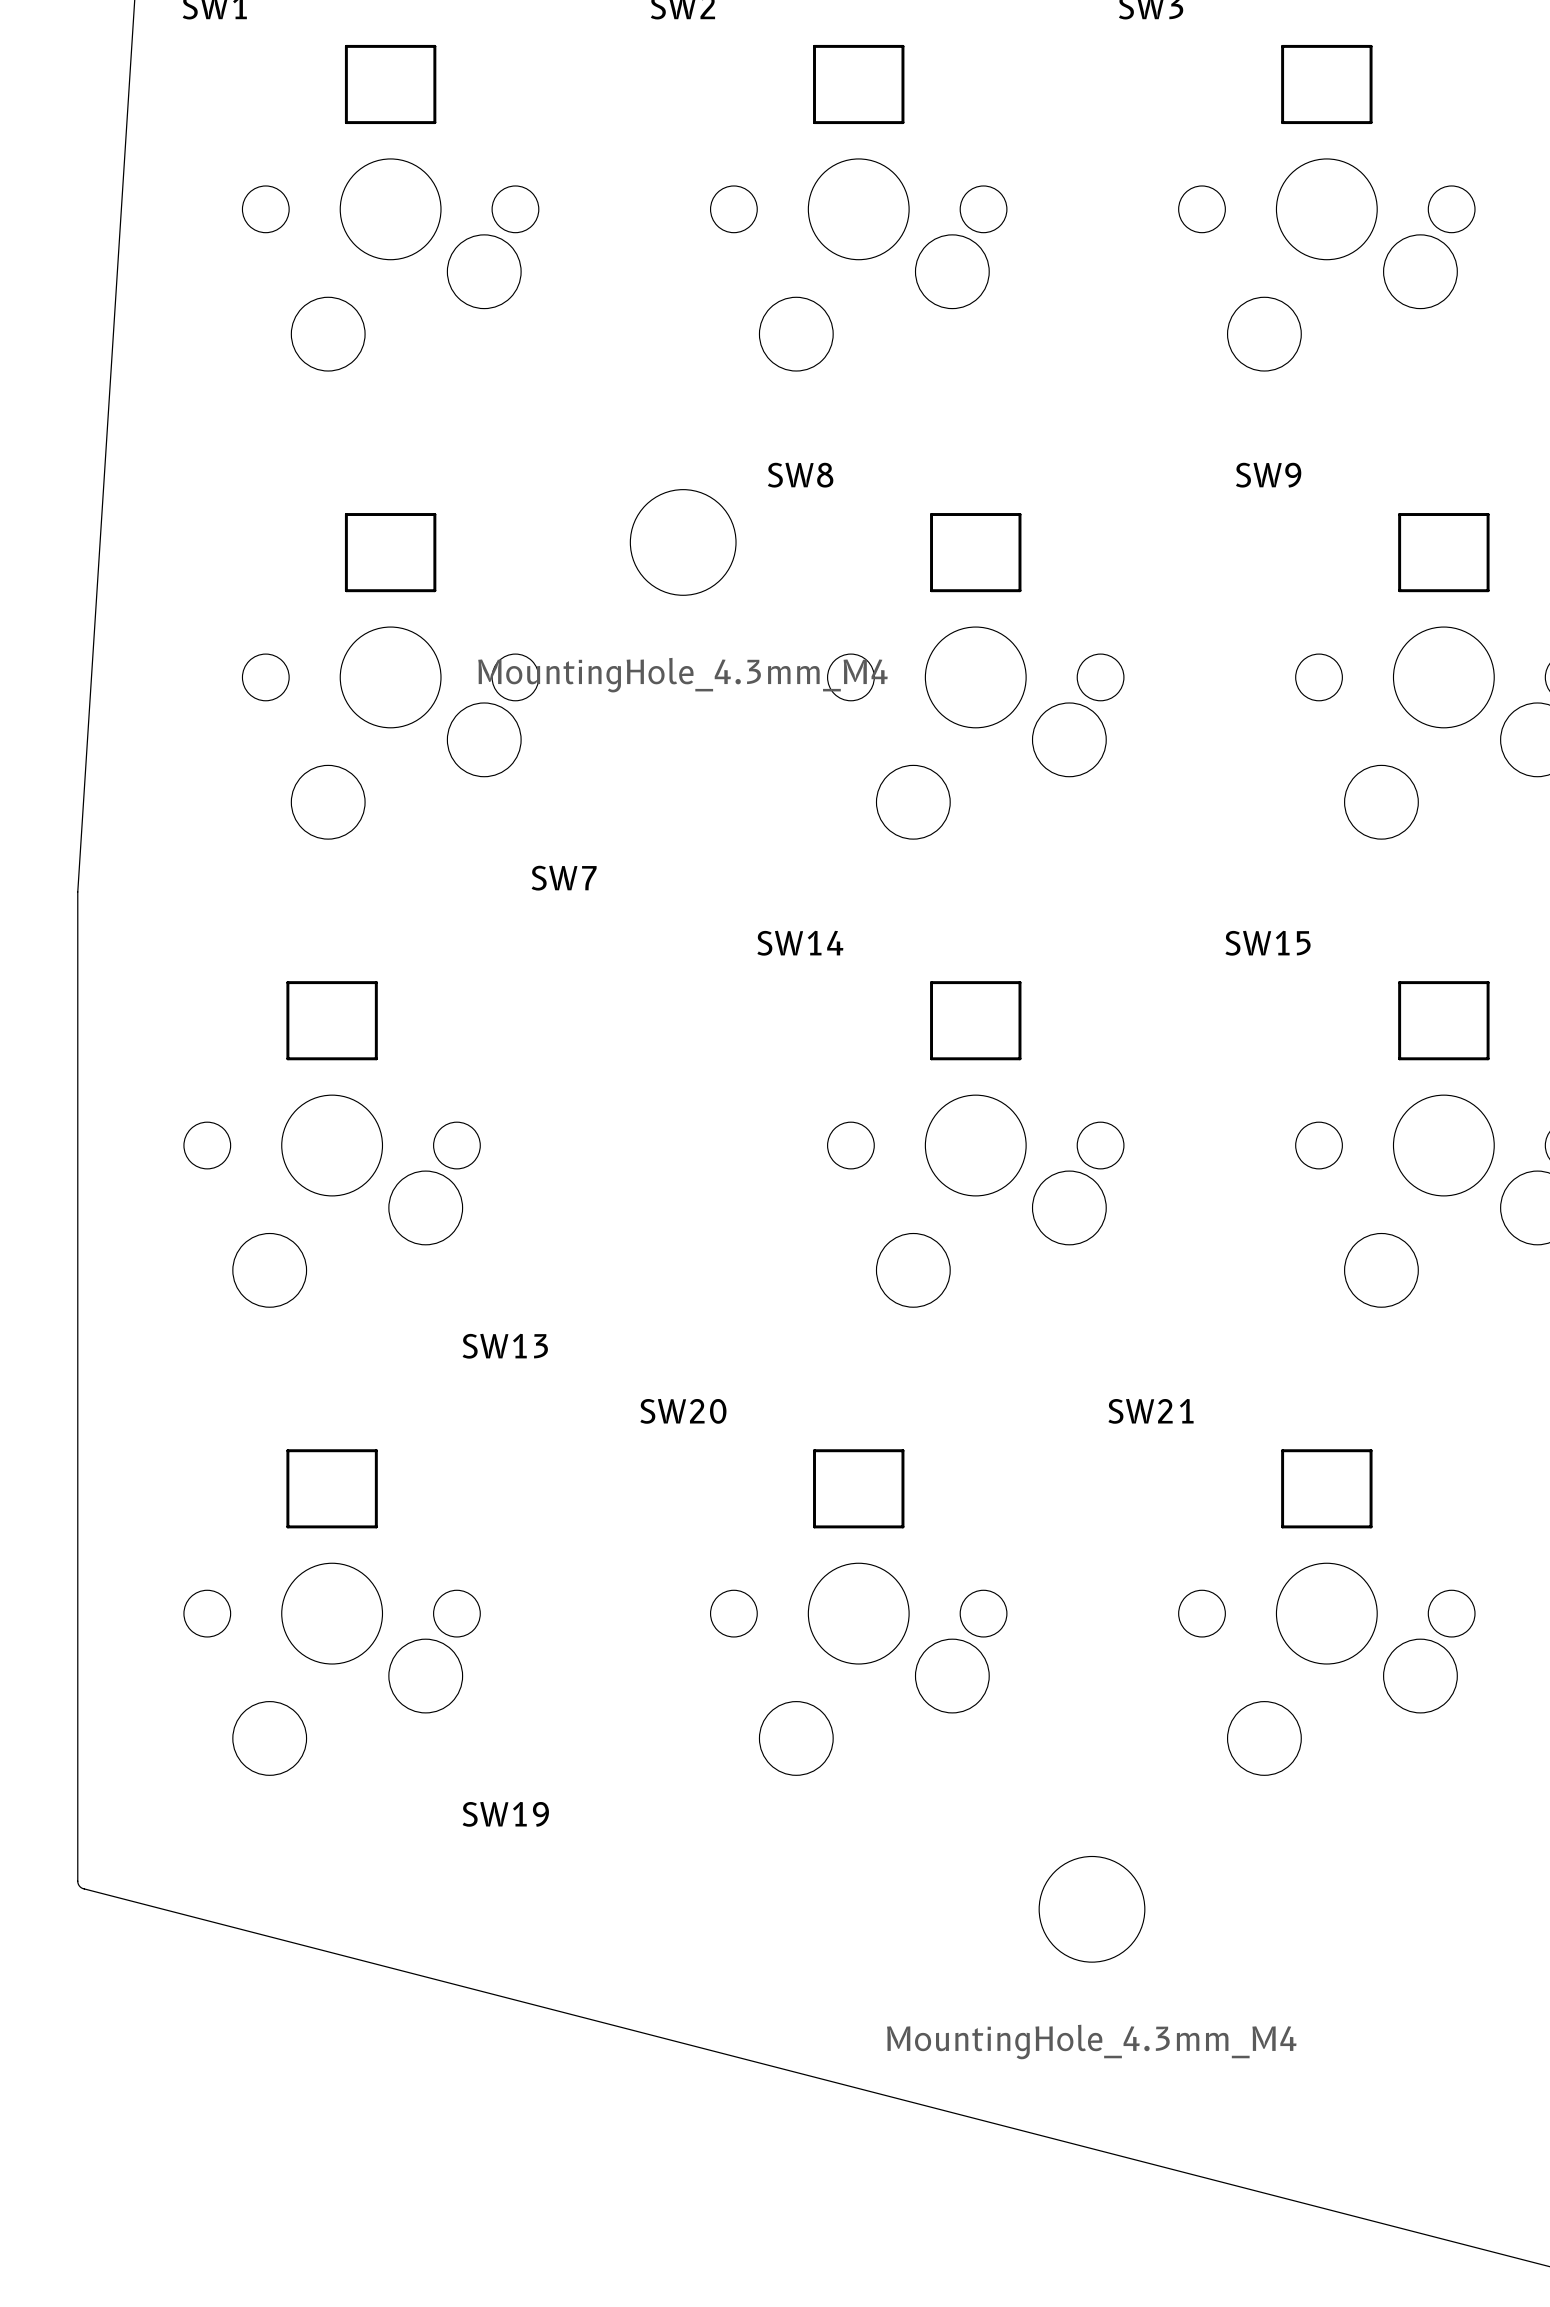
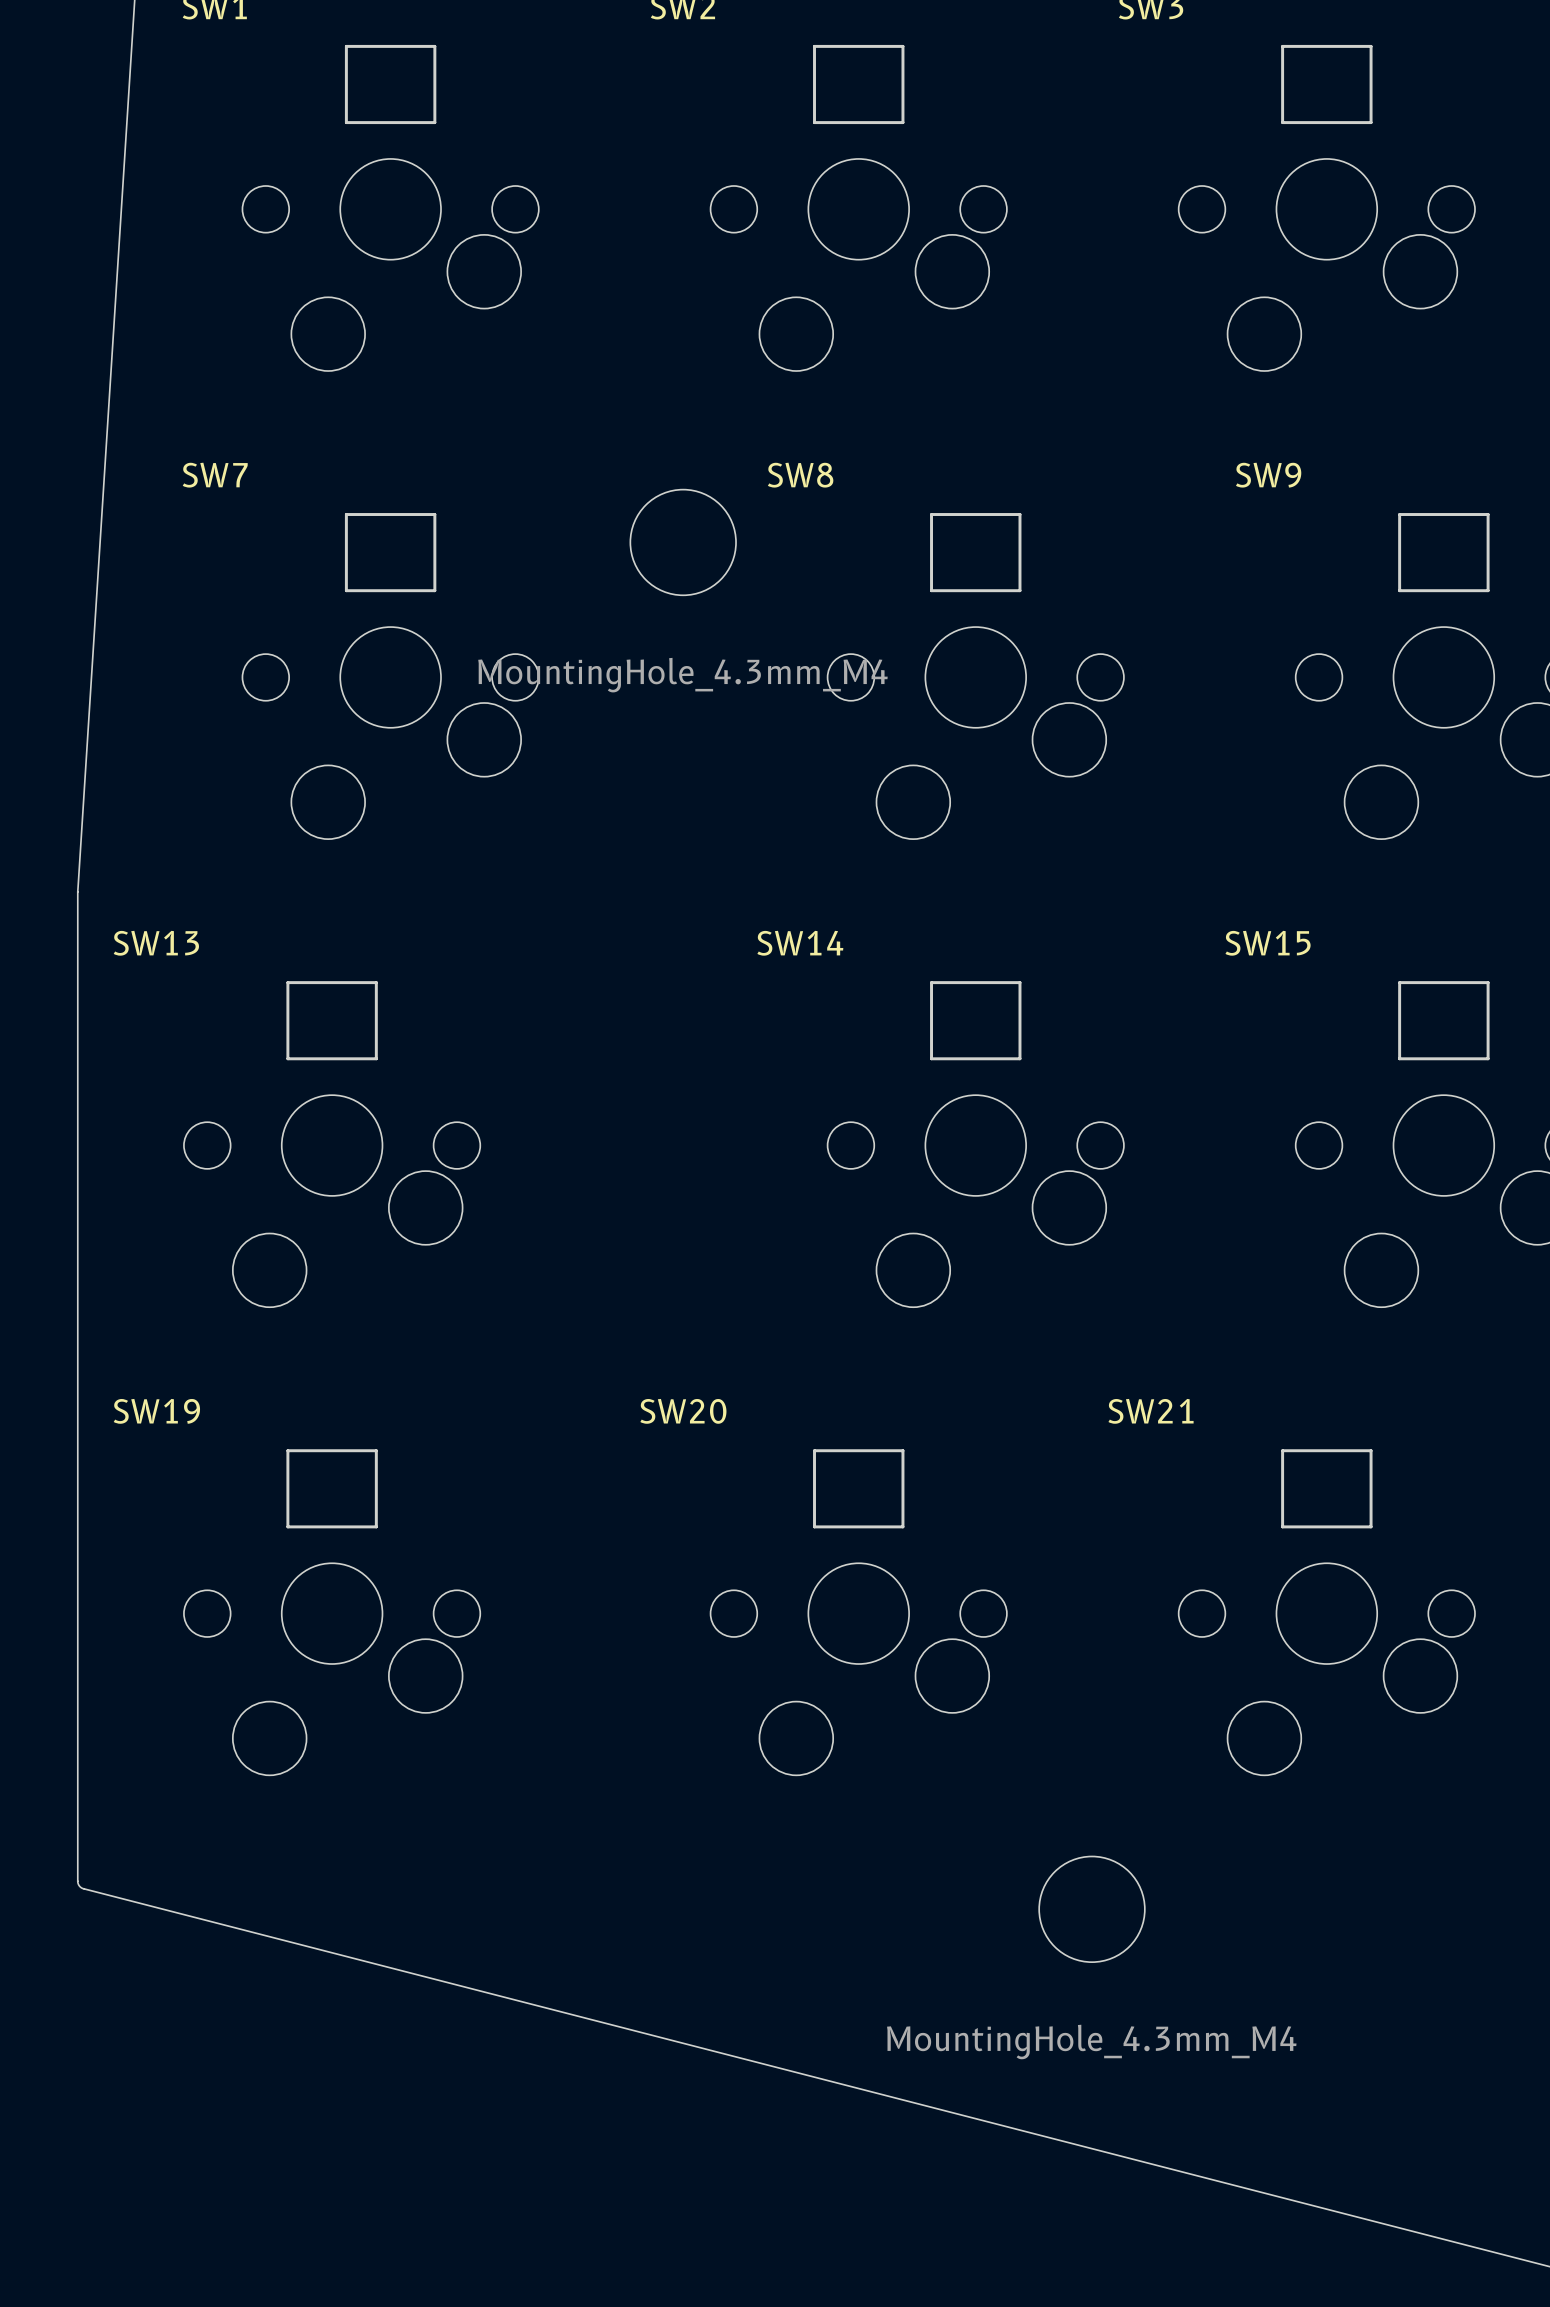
SW7 name position: SW7 (564, 878) -> SW7 (215, 475)
SW13 name position: SW13 (505, 1346) -> SW13 (156, 943)
SW19 name position: SW19 (505, 1814) -> SW19 (156, 1411)

